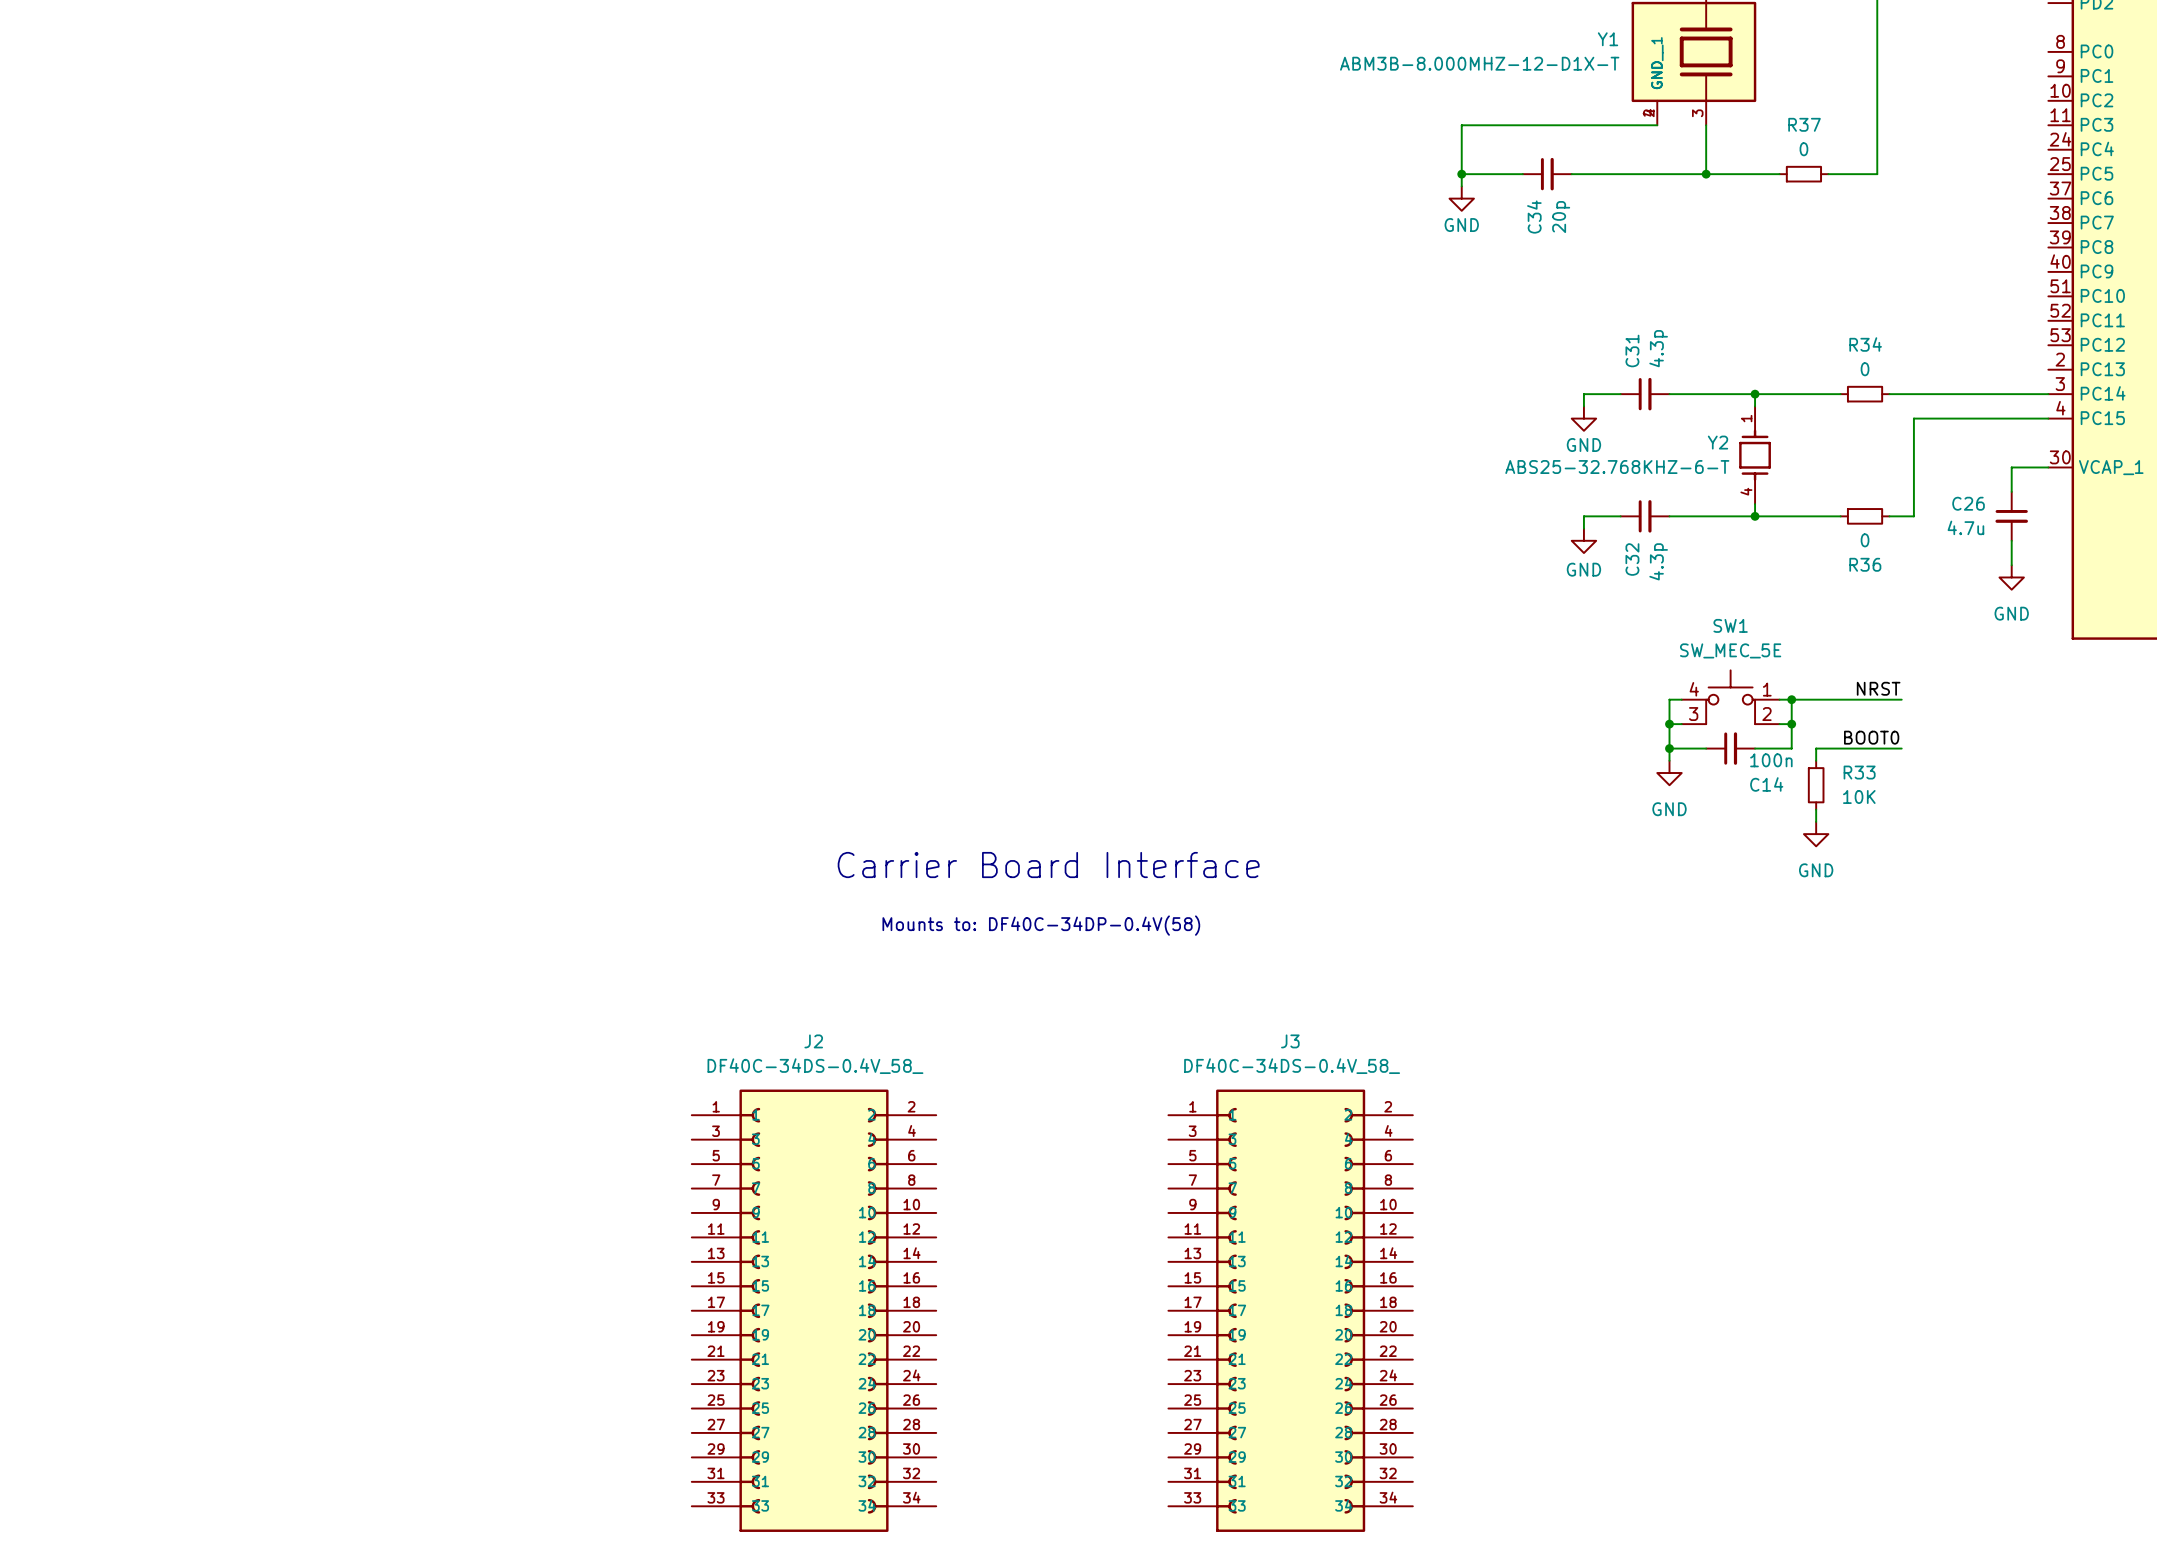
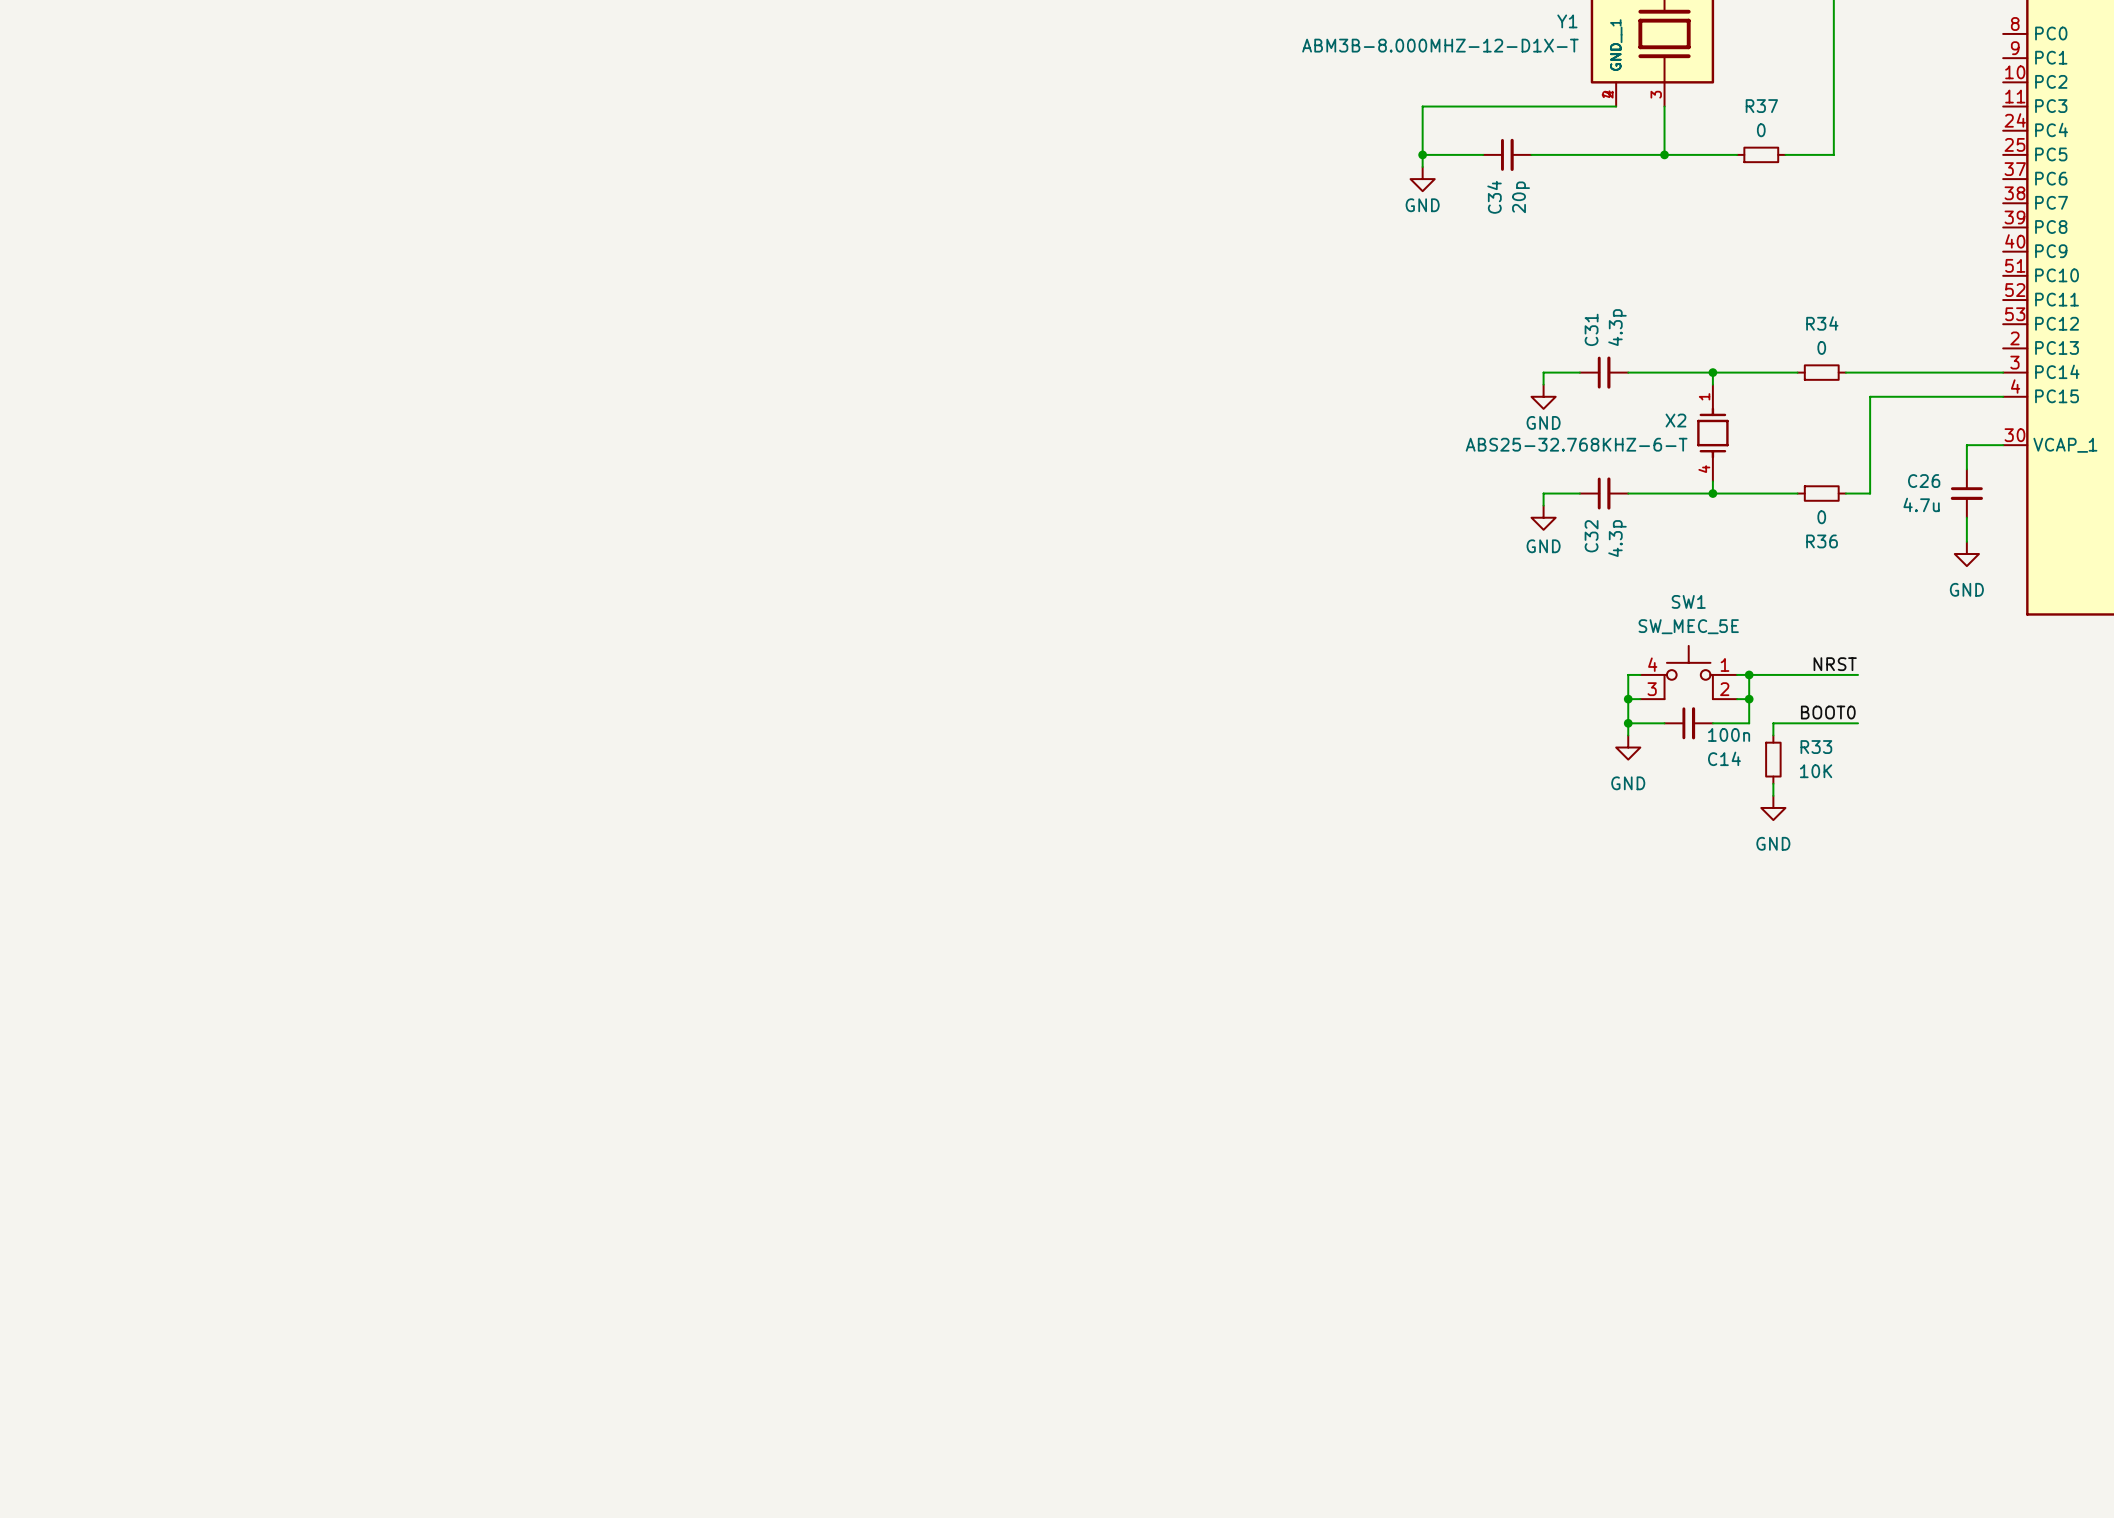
Y2 name: Y2 (1718, 442) -> X2 (1675, 420)
text: Carrier Board Interface (1048, 865) -> none
text: Mounts to: DF40C-34DP-0.4V(58) (1041, 925) -> none
J2: DF40C-34DS-0.4V_58_ (814, 1310) -> none
J3: DF40C-34DS-0.4V_58_ (1290, 1310) -> none

